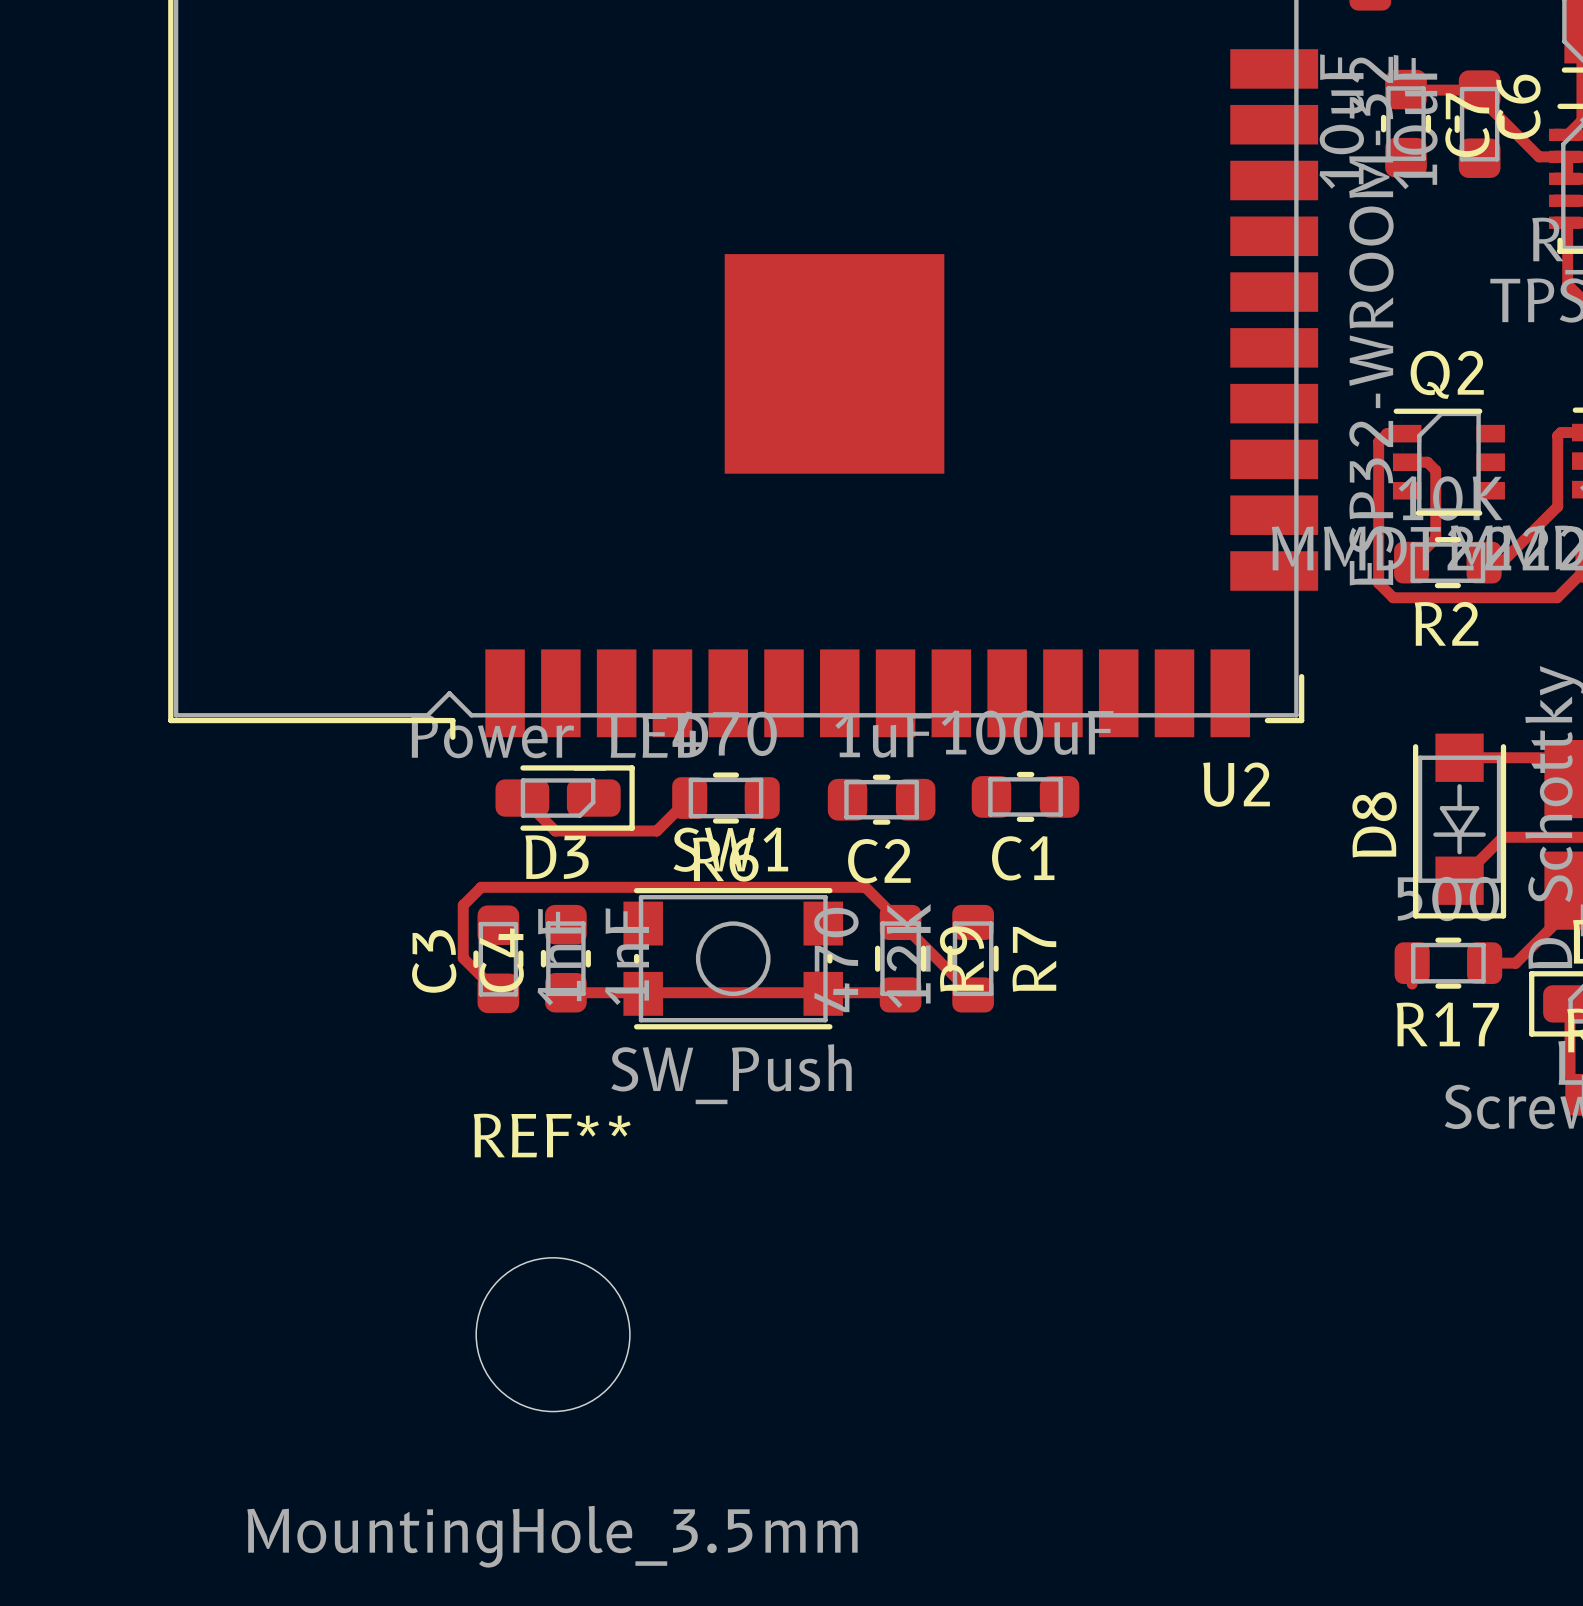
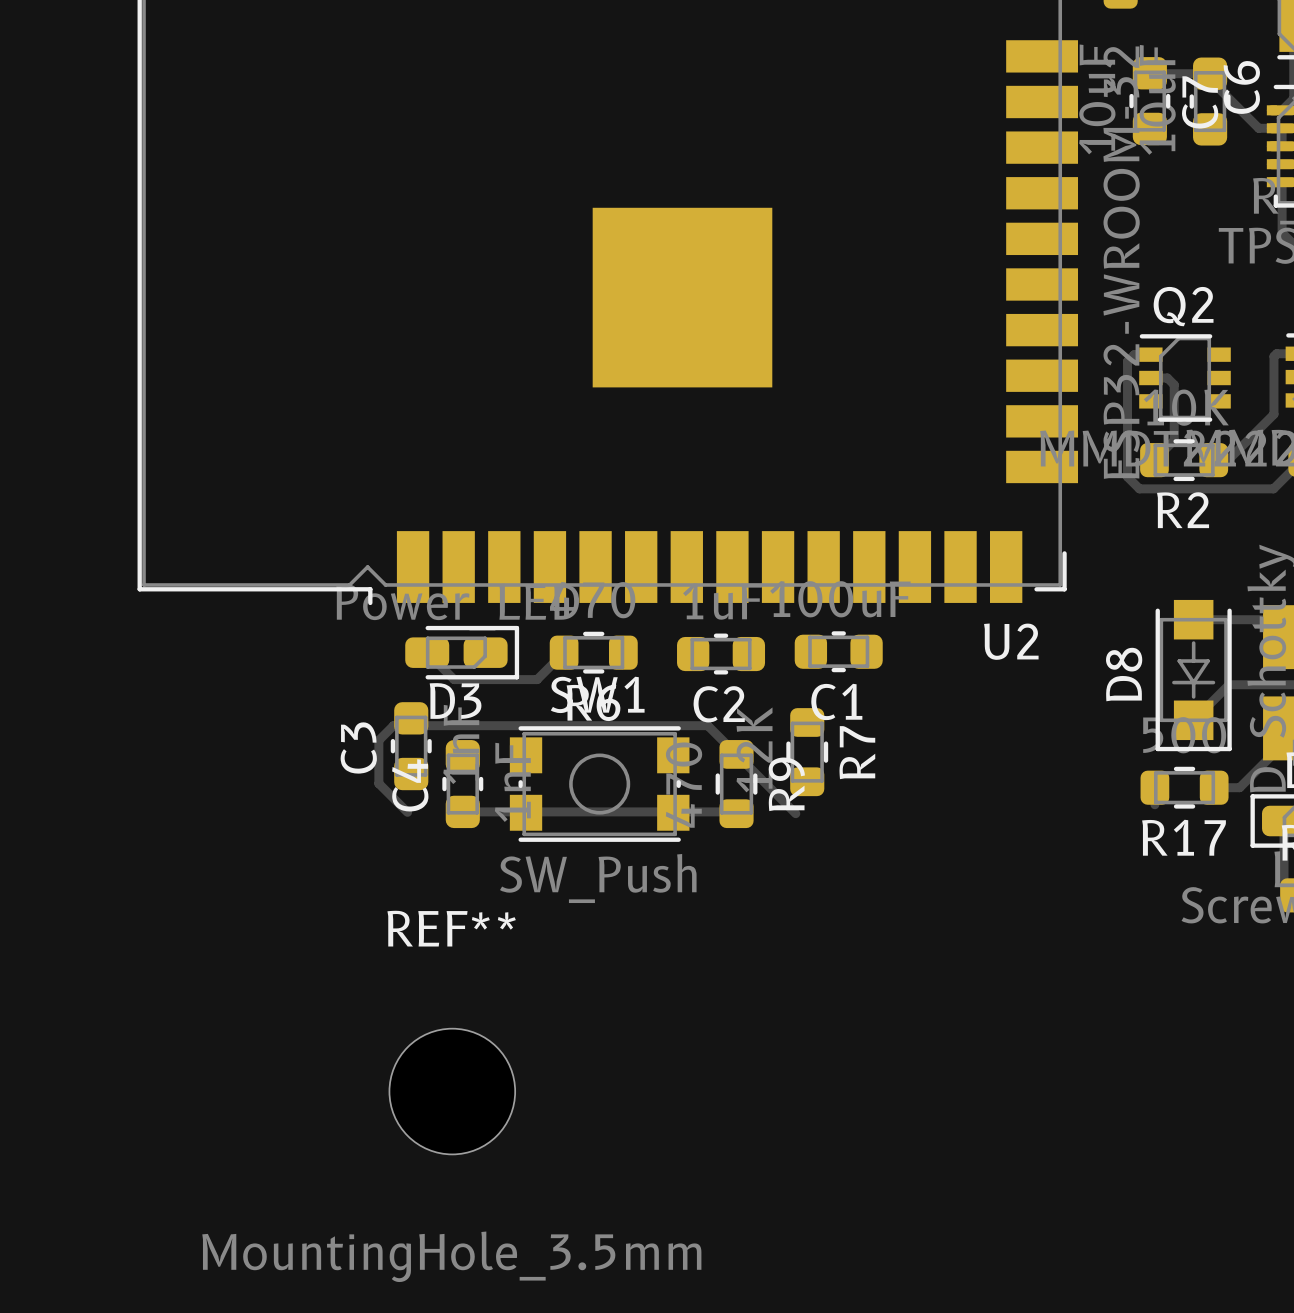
R7 position: (973, 958) -> (807, 752)
C3 position: (498, 959) -> (411, 746)

